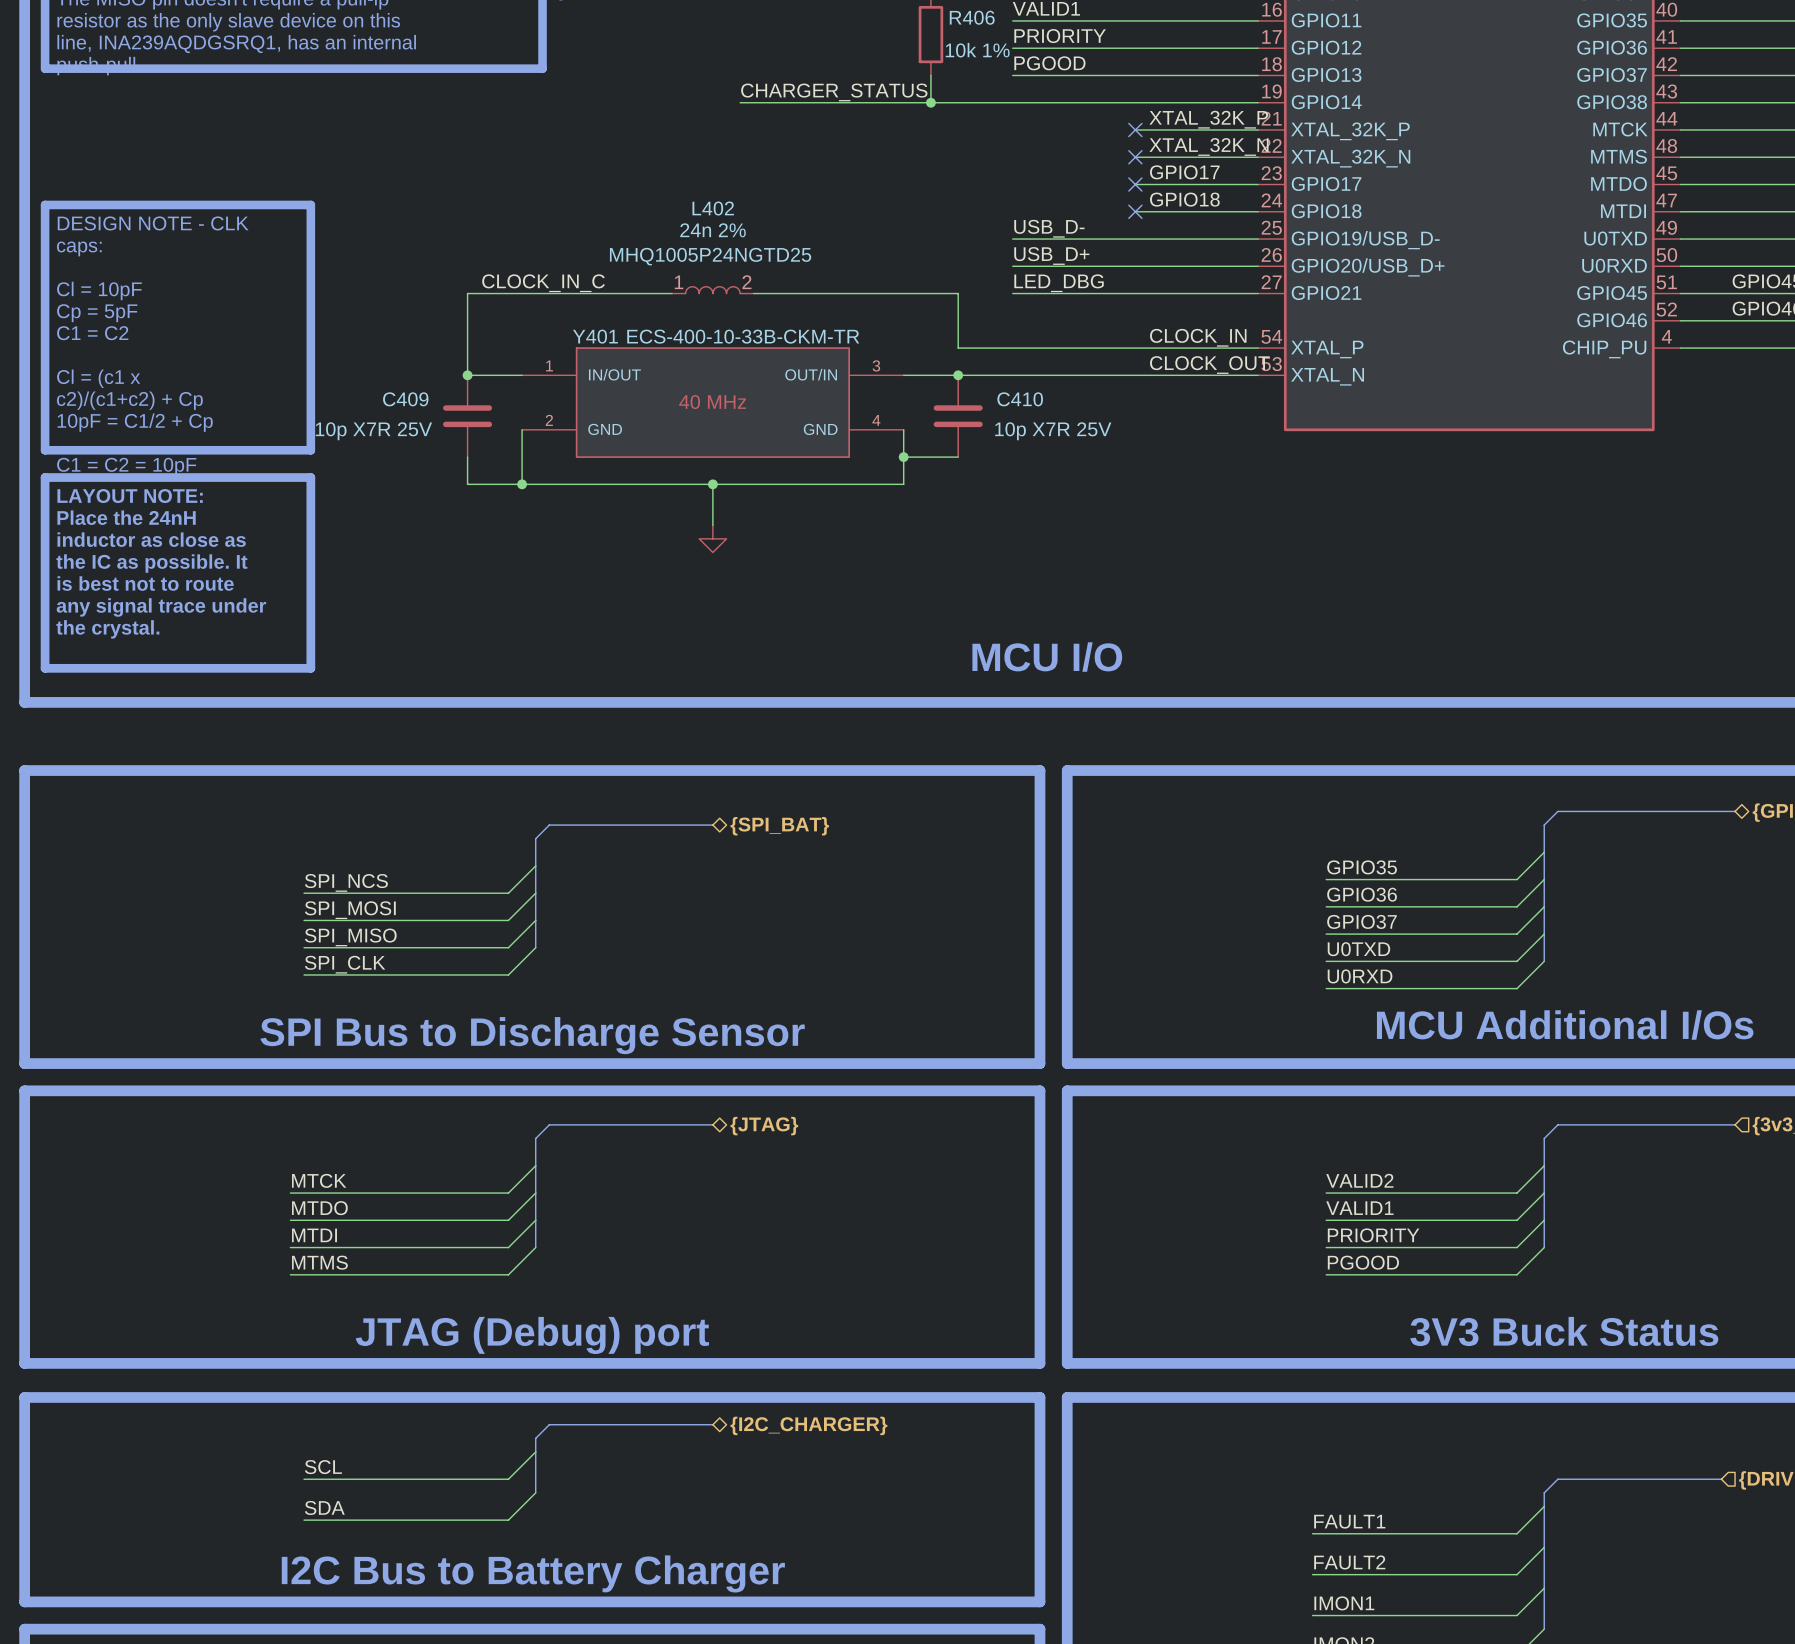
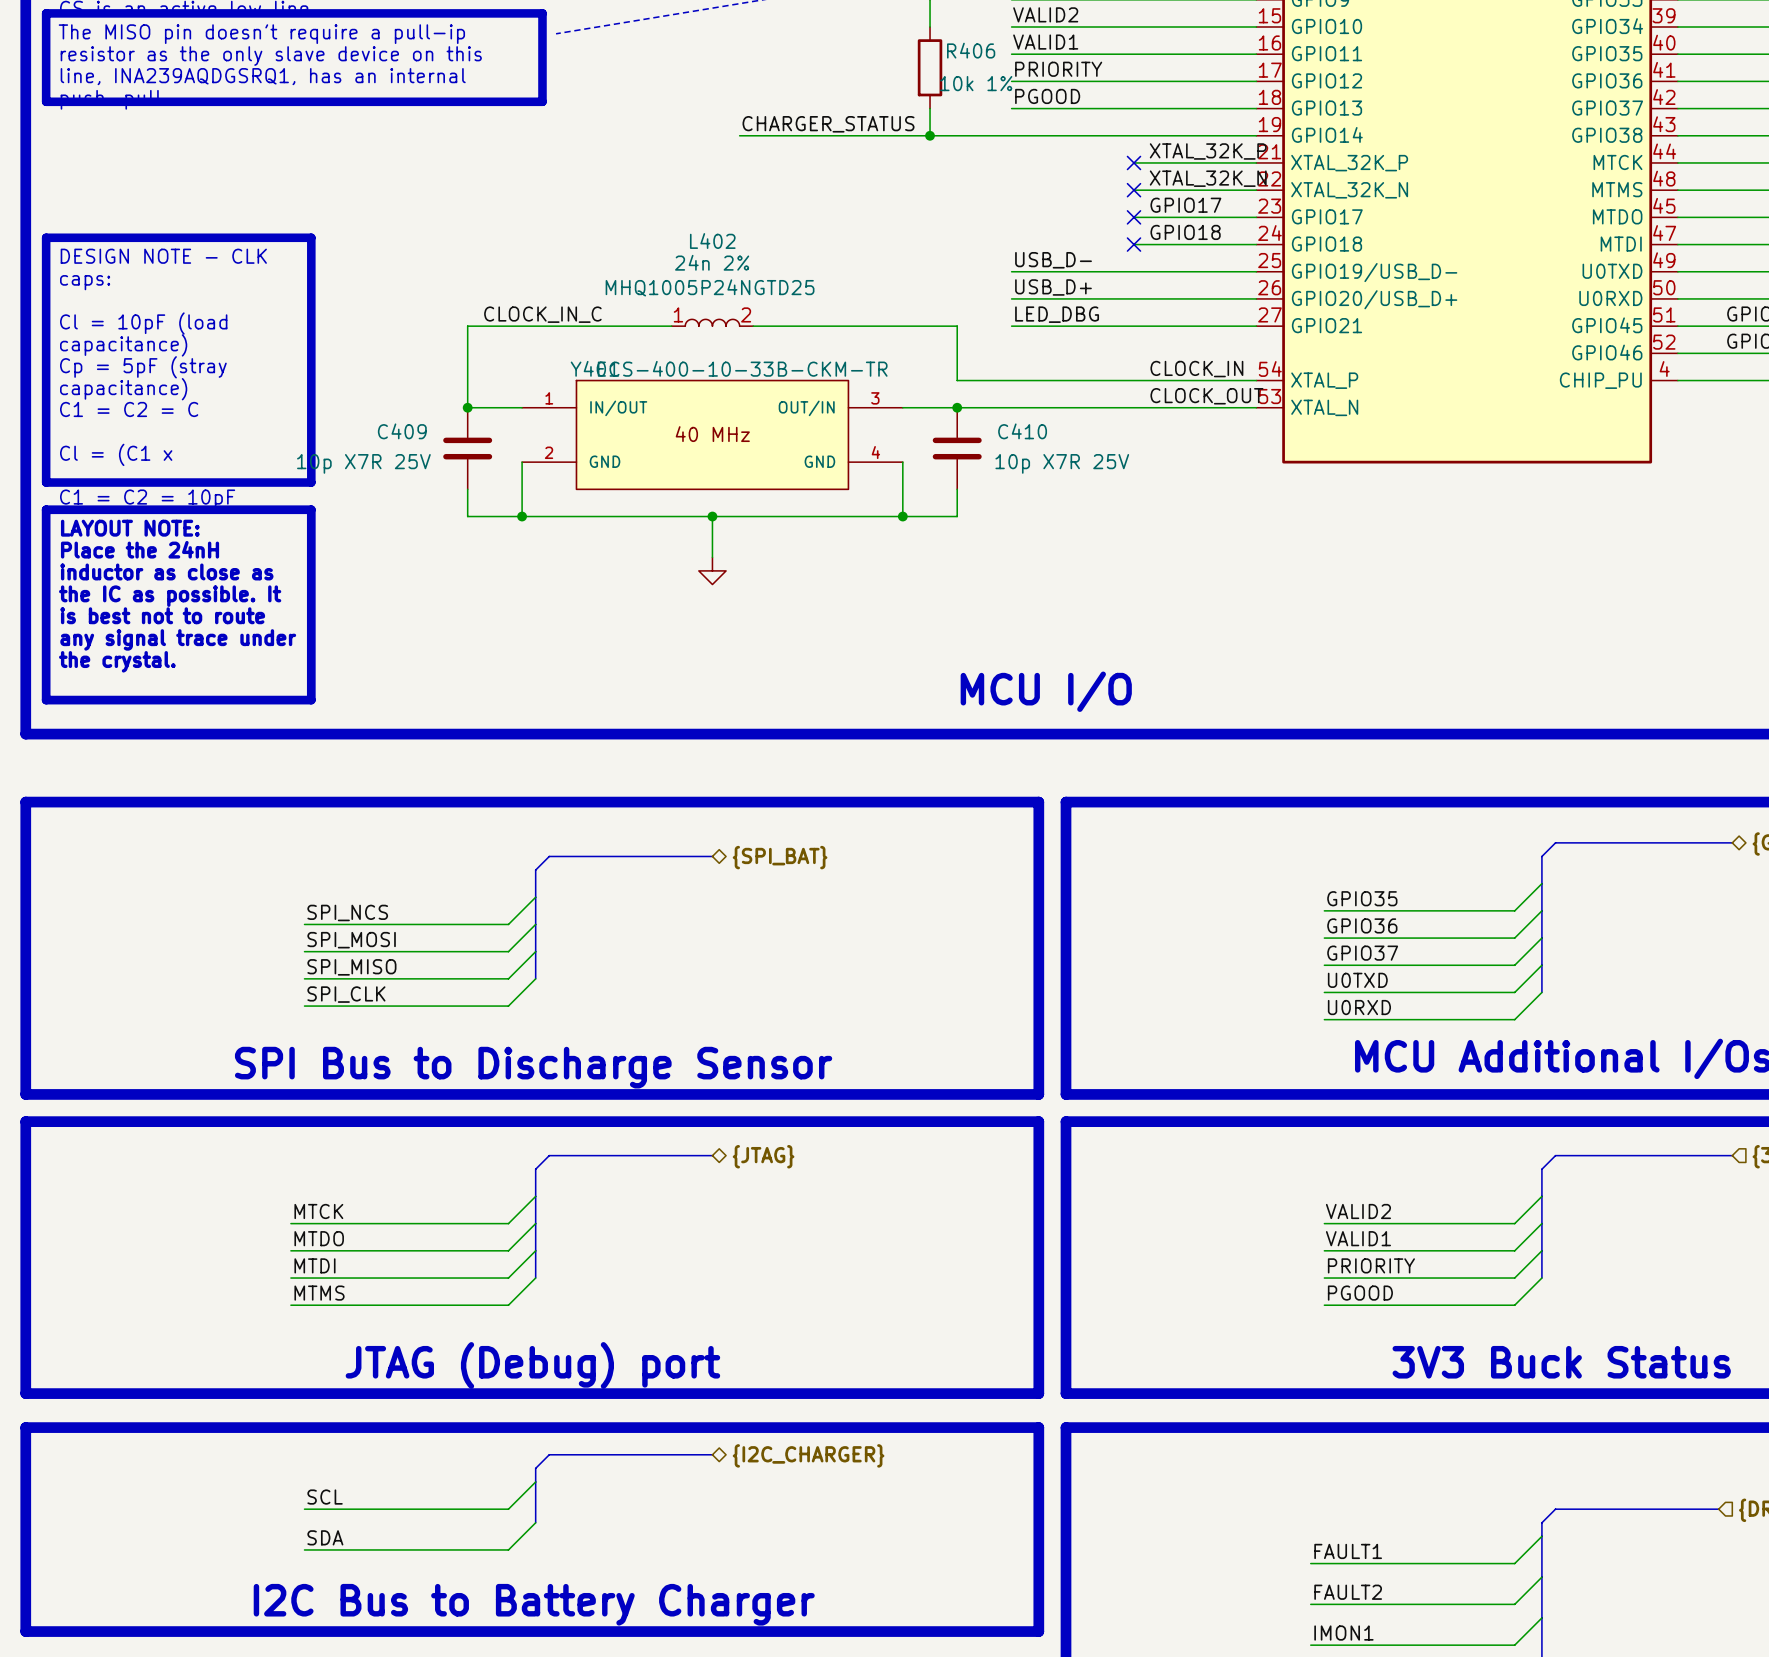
text: Cl = 10pF (99, 290) -> Cl = 10pF (load (143, 323)
text: Cp = 5pF (97, 313) -> capacitance) (123, 345)
text: C1 = C2 (92, 333) -> Cp = 5pF (stray (143, 367)
text: none -> capacitance) (123, 389)
text: Cl = (c1 x (98, 378) -> C1 = C2 = C (129, 409)
text: c2)/(c1+c2) + Cp (129, 400) -> none
text: 10pF = C1/2 + Cp (135, 422) -> Cl = (C1 x (116, 454)
wire: (903, 457) (958, 457) -> (902, 516) (957, 516) (957, 489)
junction position: (903, 457) -> (902, 516)

